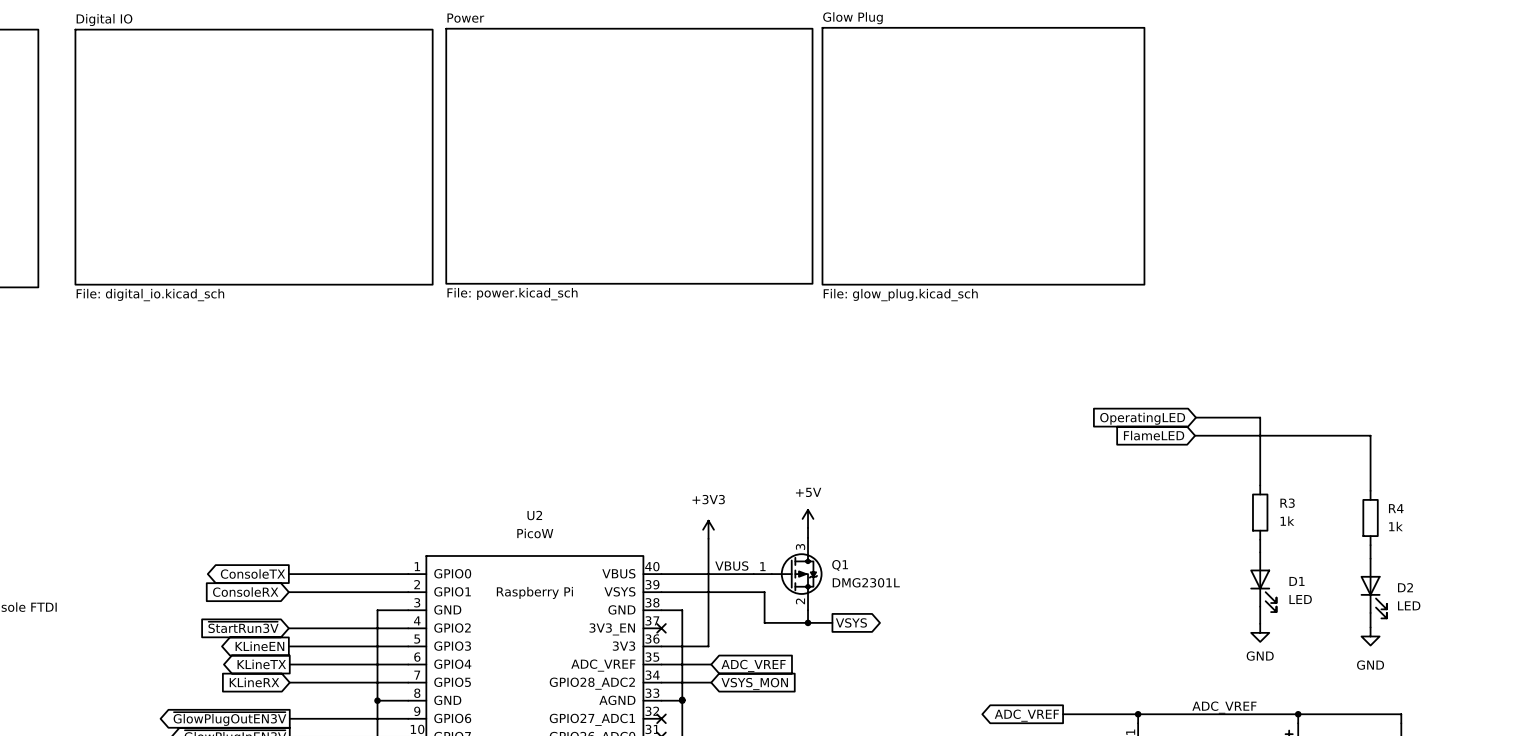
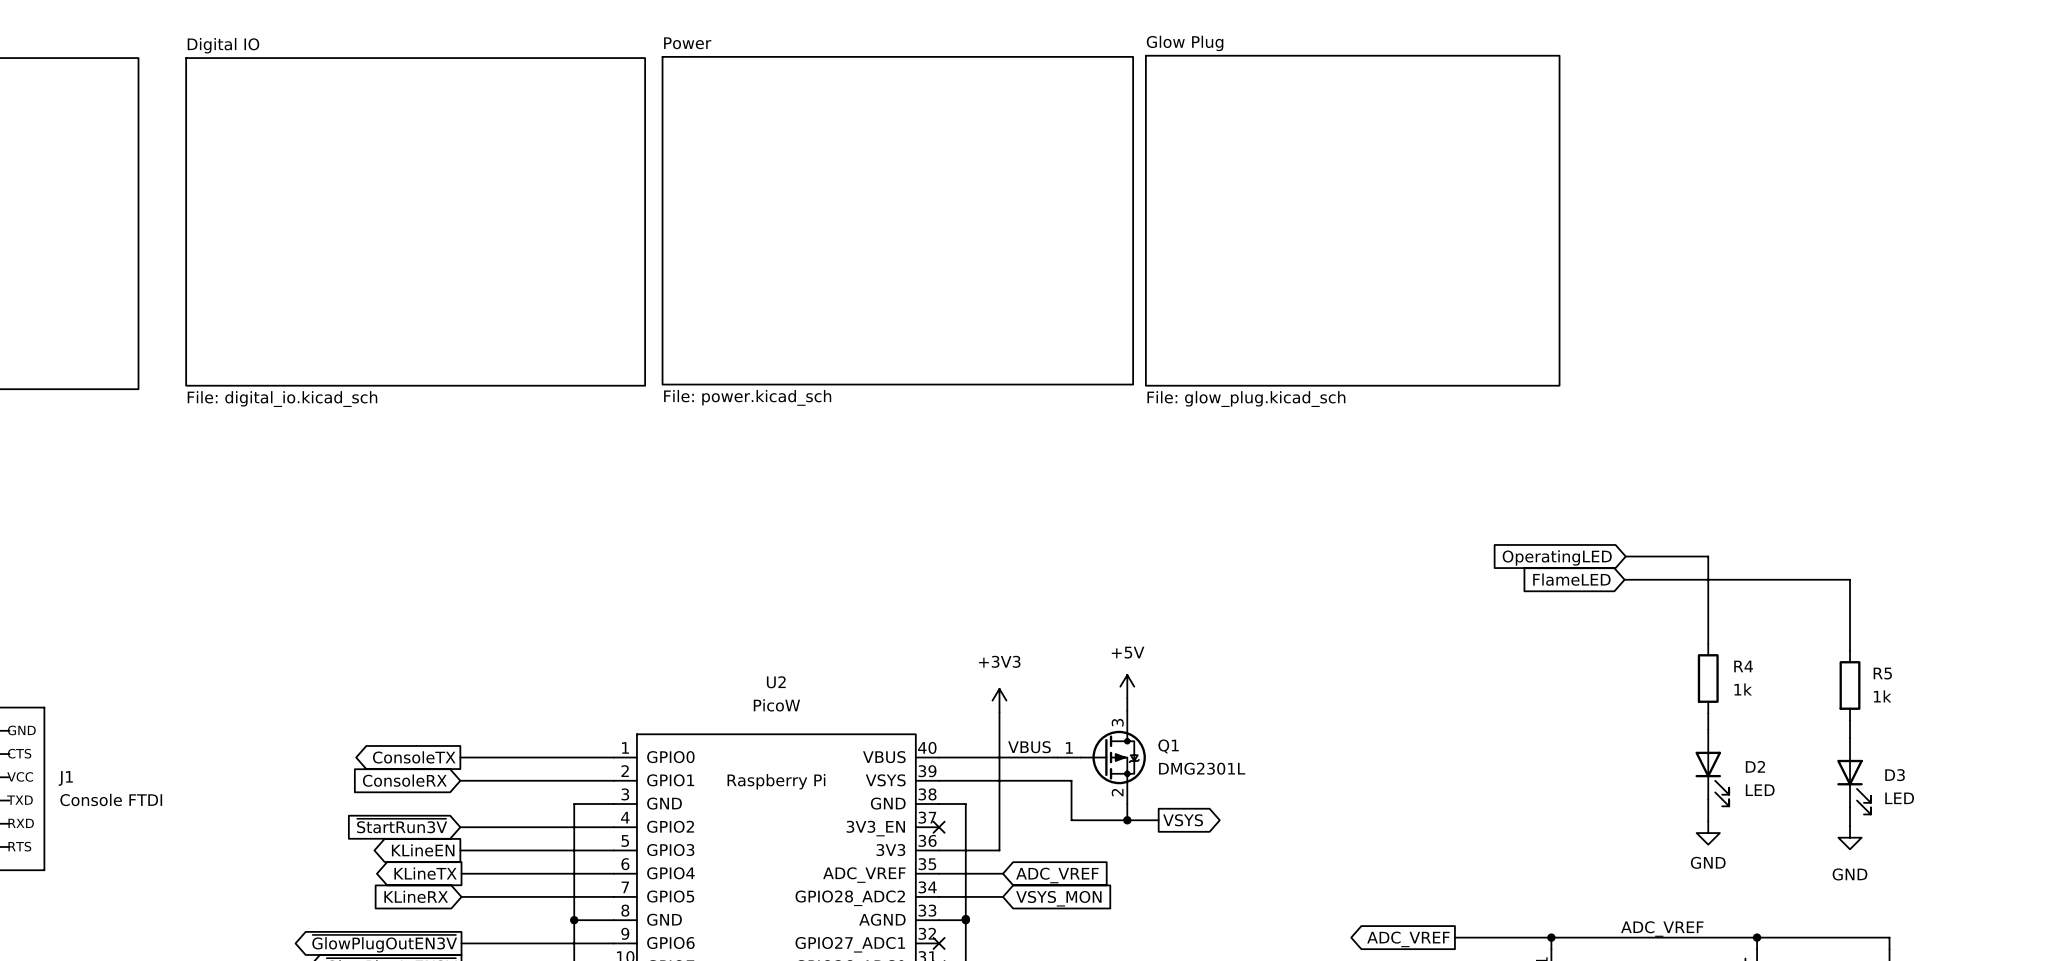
R3 name: R3 (1287, 503) -> R4 (1743, 666)
R4 name: R4 (1396, 508) -> R5 (1882, 673)
D1 name: D1 (1297, 581) -> D2 (1755, 766)
D2 name: D2 (1405, 587) -> D3 (1895, 775)

